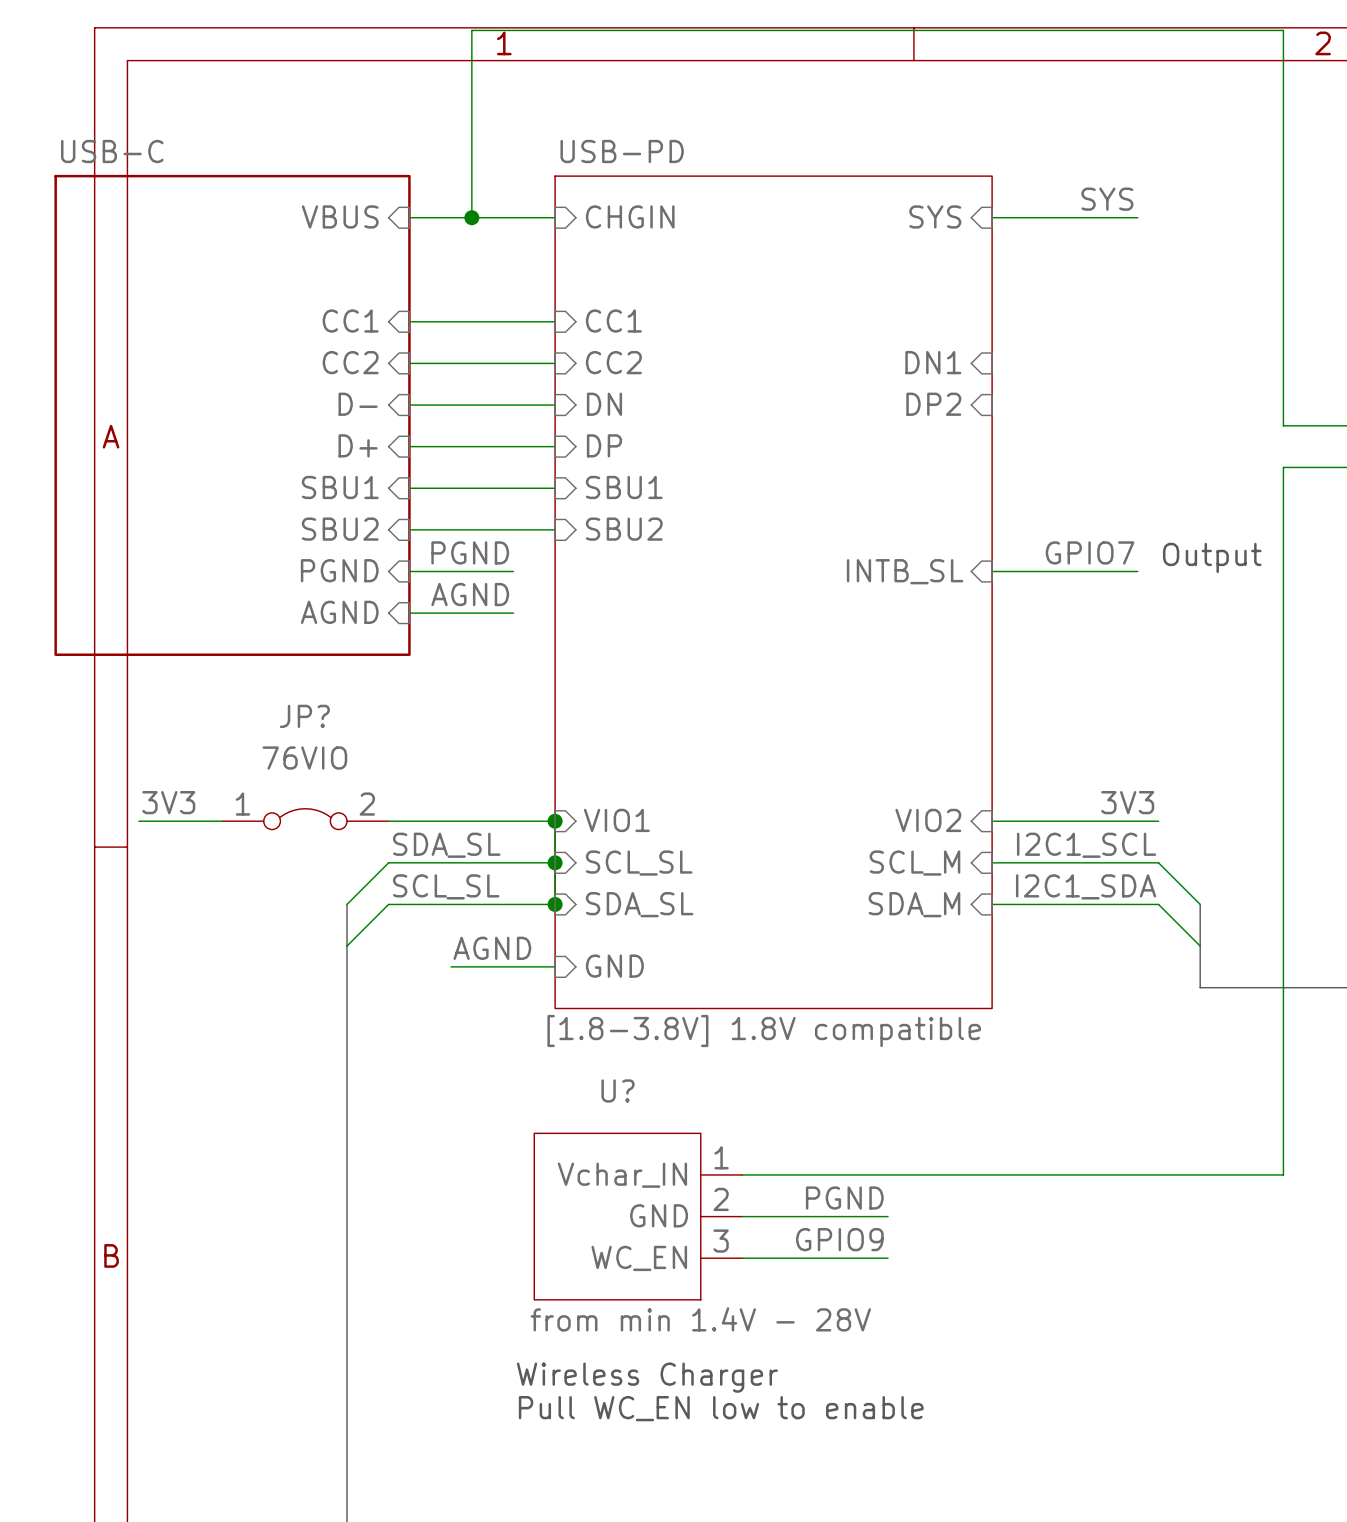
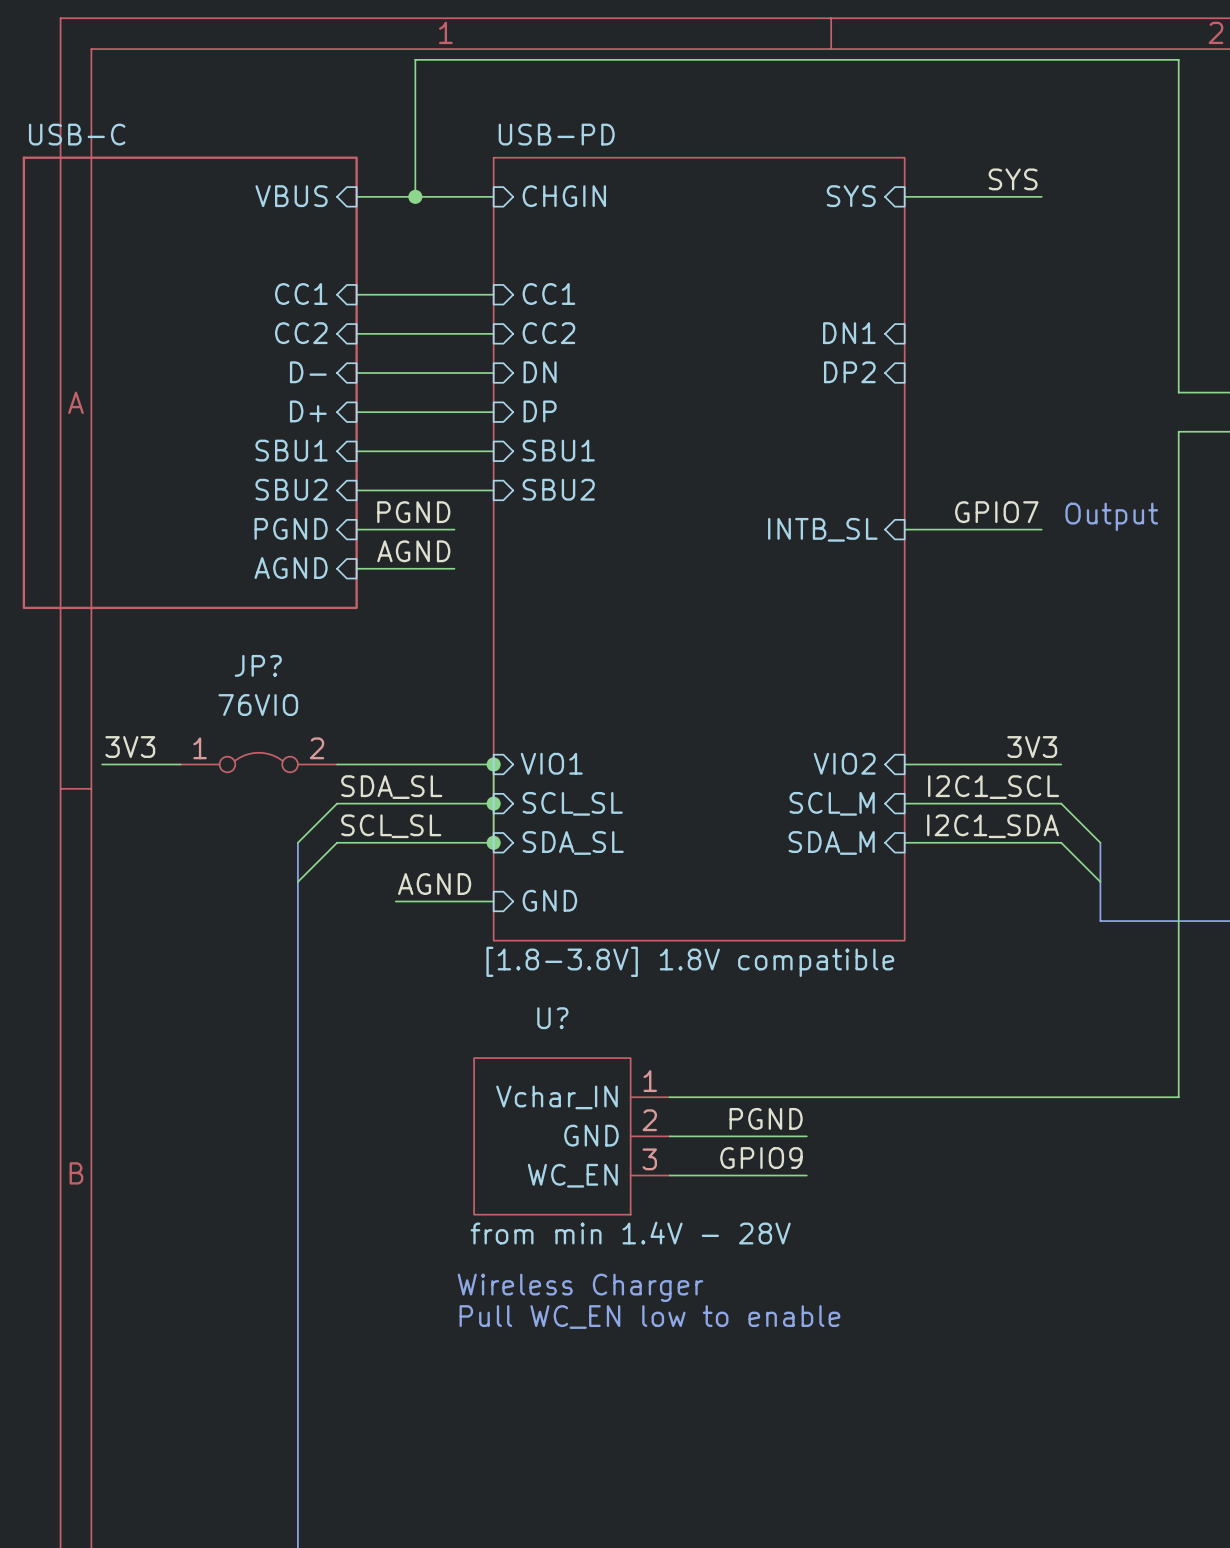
wire: (471, 72) (471, 30) (1283, 30) (1283, 72) -> (415, 59) (1178, 59)

